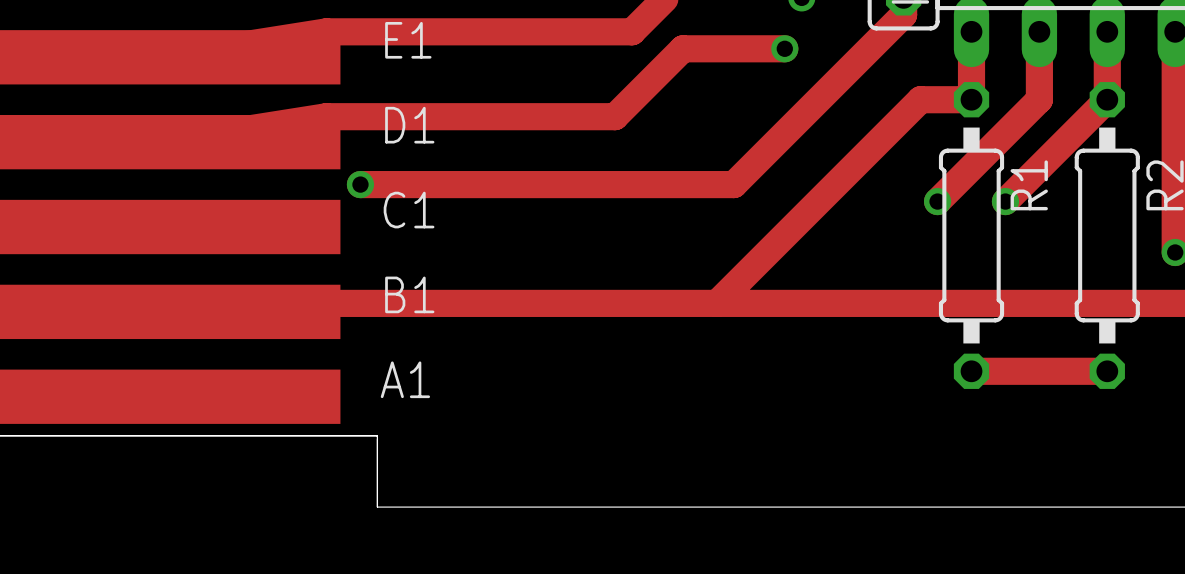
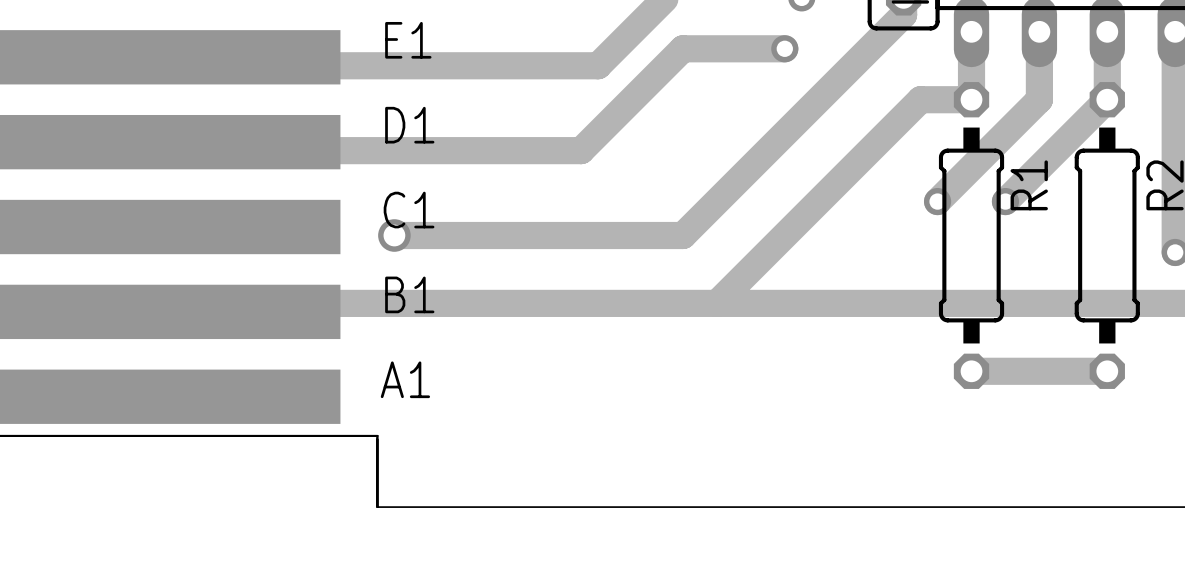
track: (632, 31) (326, 31) (165, 57) -> (632, 31) (598, 65) (292, 65) (165, 57)
track: (615, 116) (326, 116) (165, 142) -> (615, 116) (581, 150) (292, 150) (165, 142)
track: (360, 184) (733, 184) -> (394, 235) (682, 235) (733, 184)
via: (360, 184) -> none
via: none -> (394, 235)

